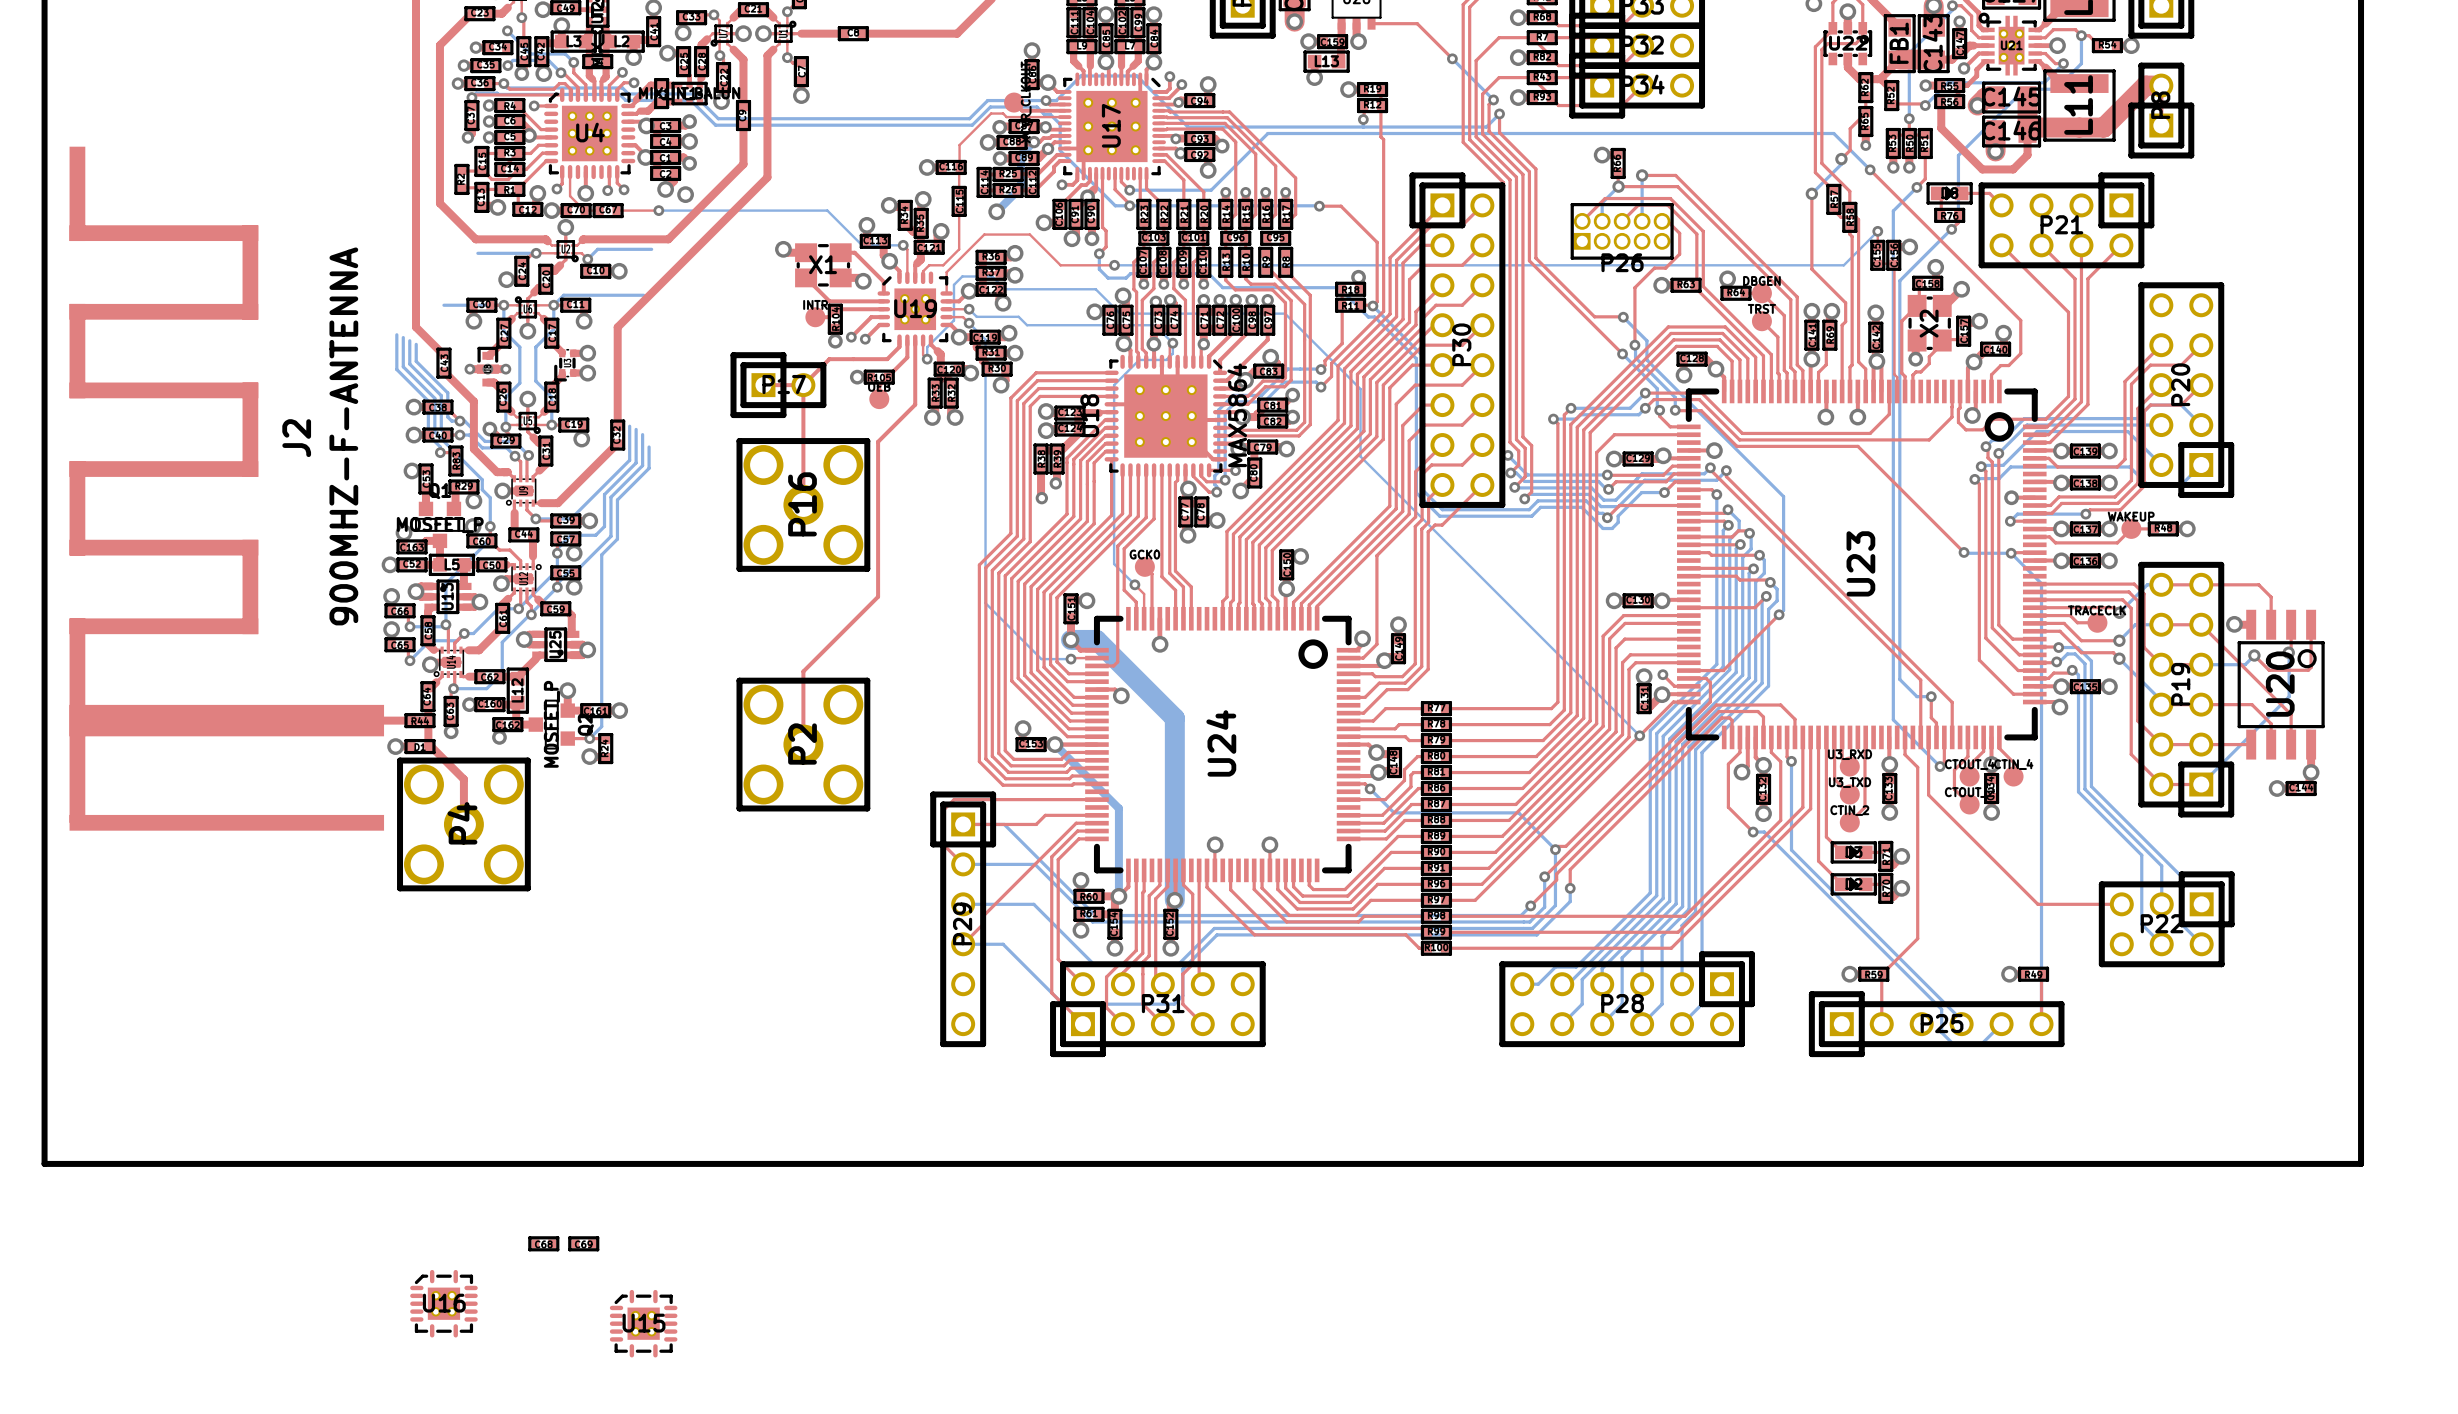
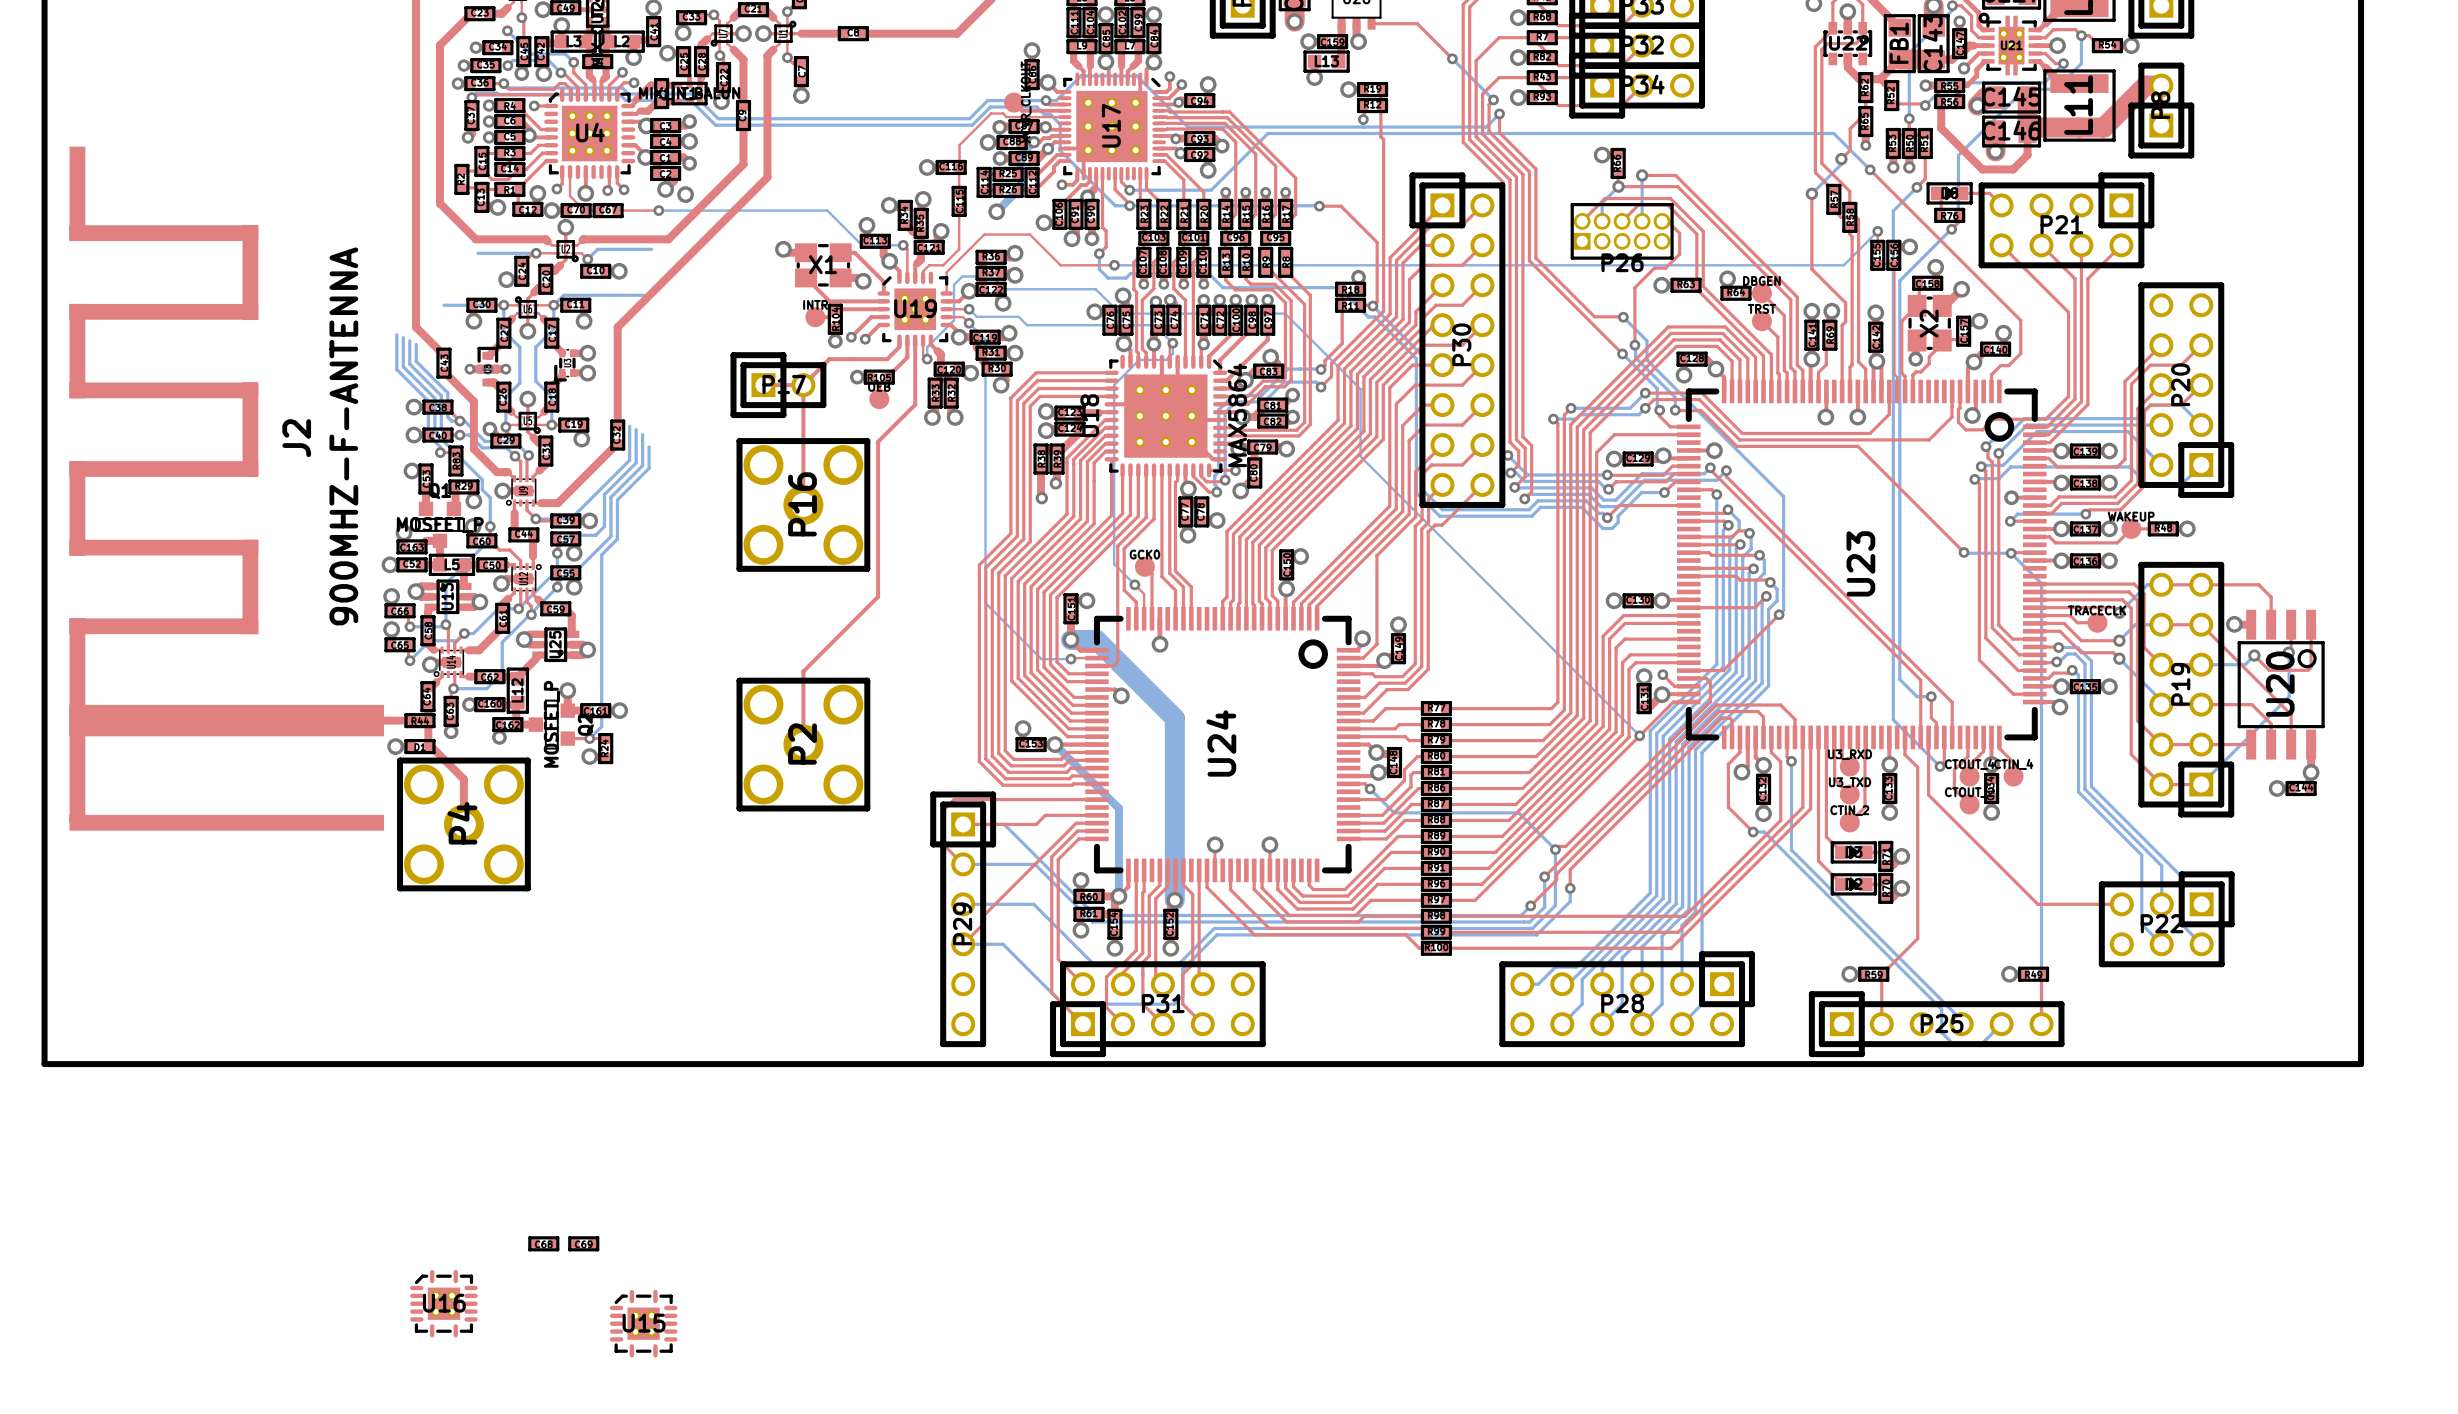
board edge: (44, 1064) (44, 1163) (2361, 1163) (2361, 1064) -> (44, 1064) (2361, 1064)

